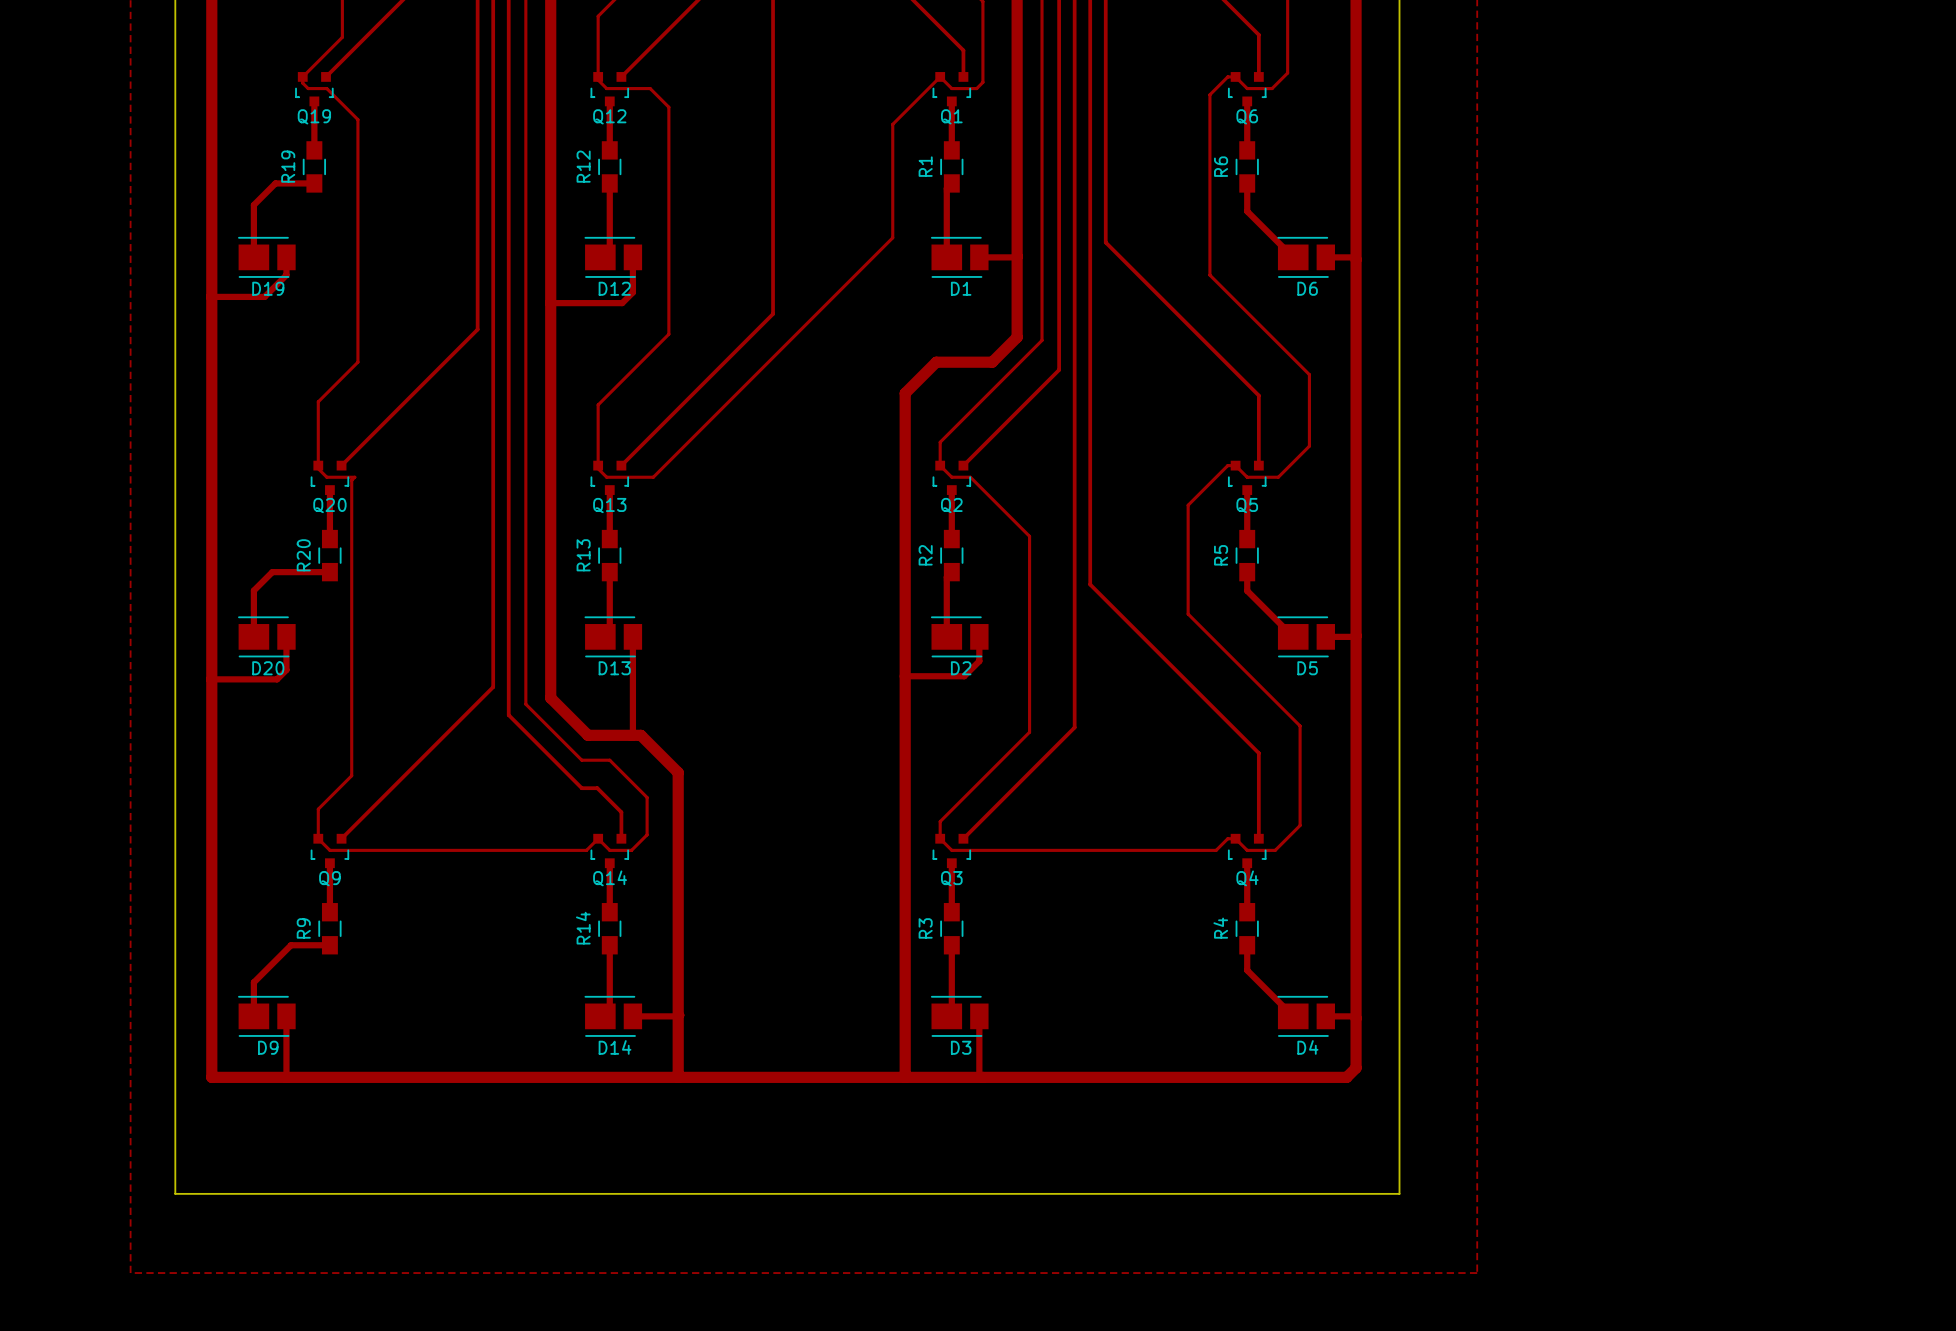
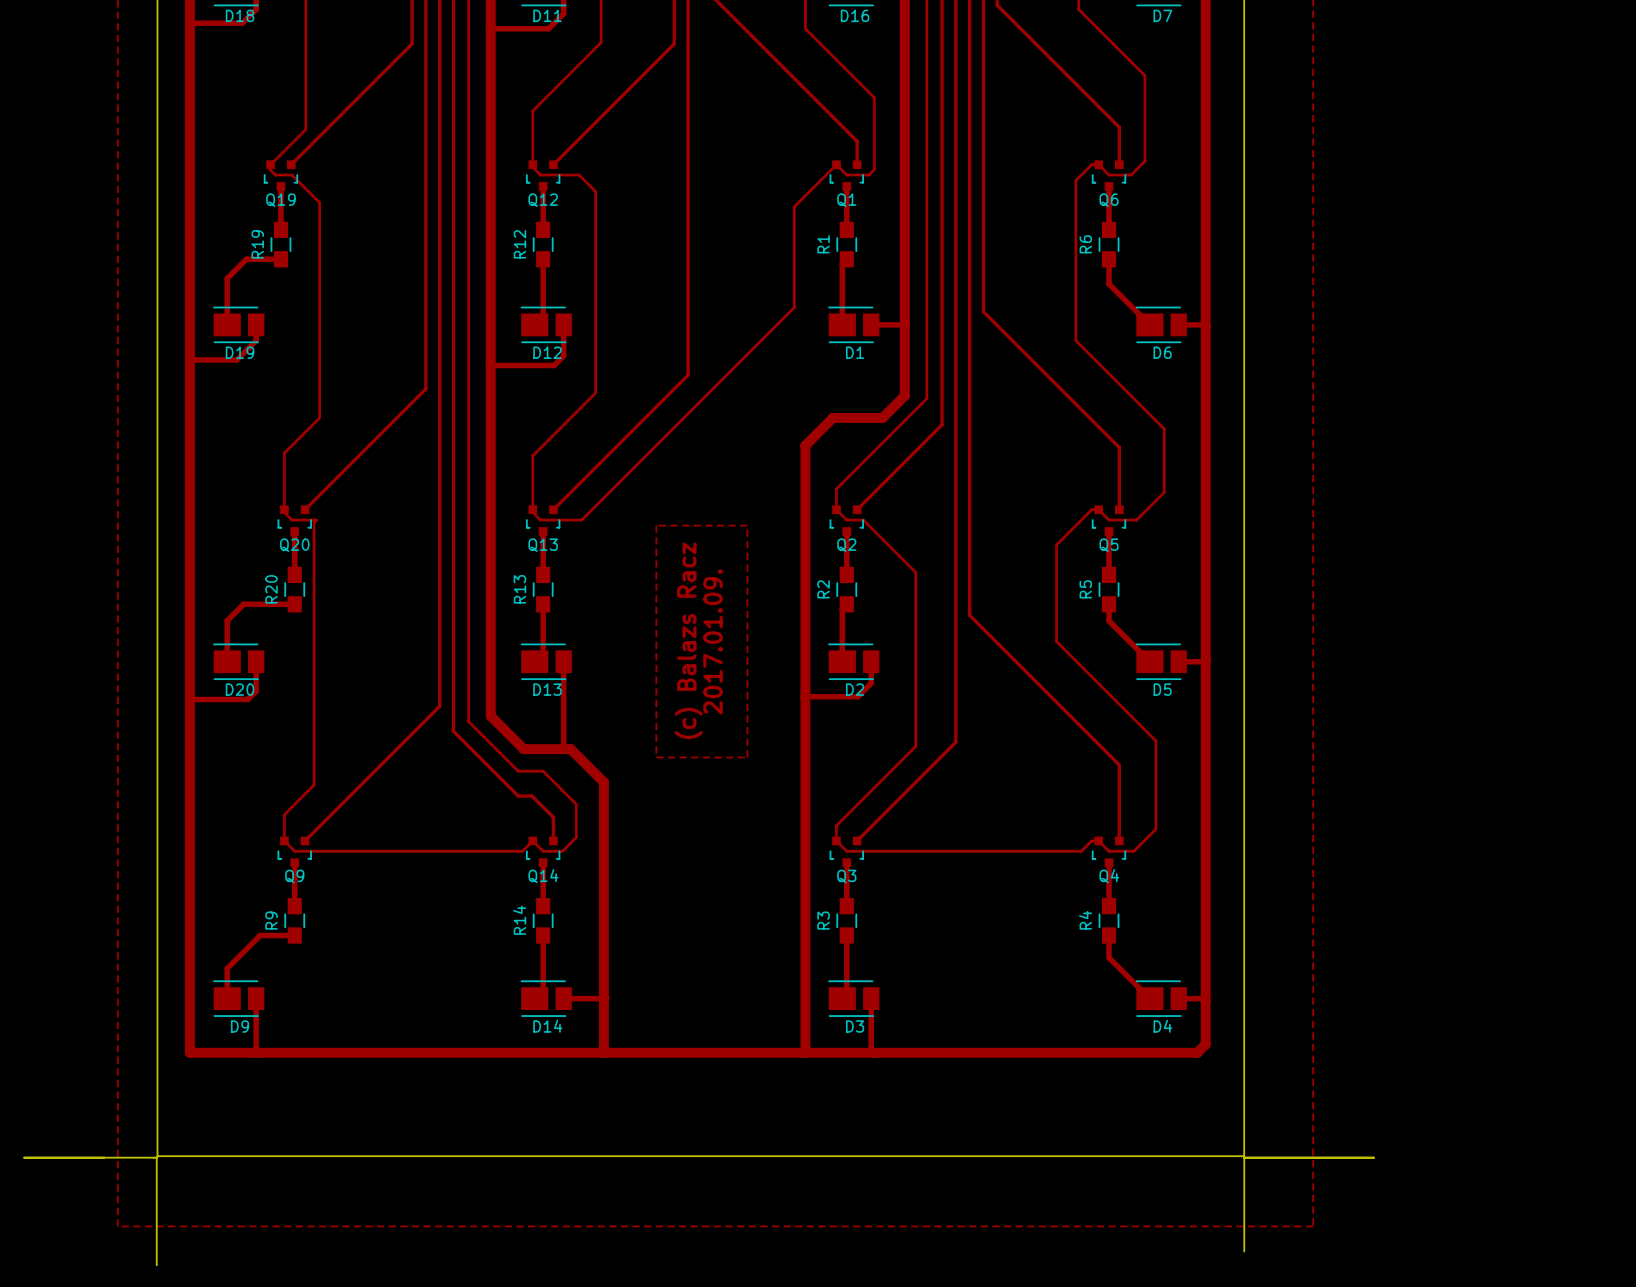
zone outline: none -> (656, 525) (656, 757) (747, 757) (747, 525) (656, 525)
text: none -> (c) Balazs Racz (688, 640)
text: none -> 2017.01.09. (713, 641)
board edge: none -> (24, 1157) (156, 1157) (156, 1265)
board edge: none -> (1374, 1157) (1244, 1157) (1244, 1251)

